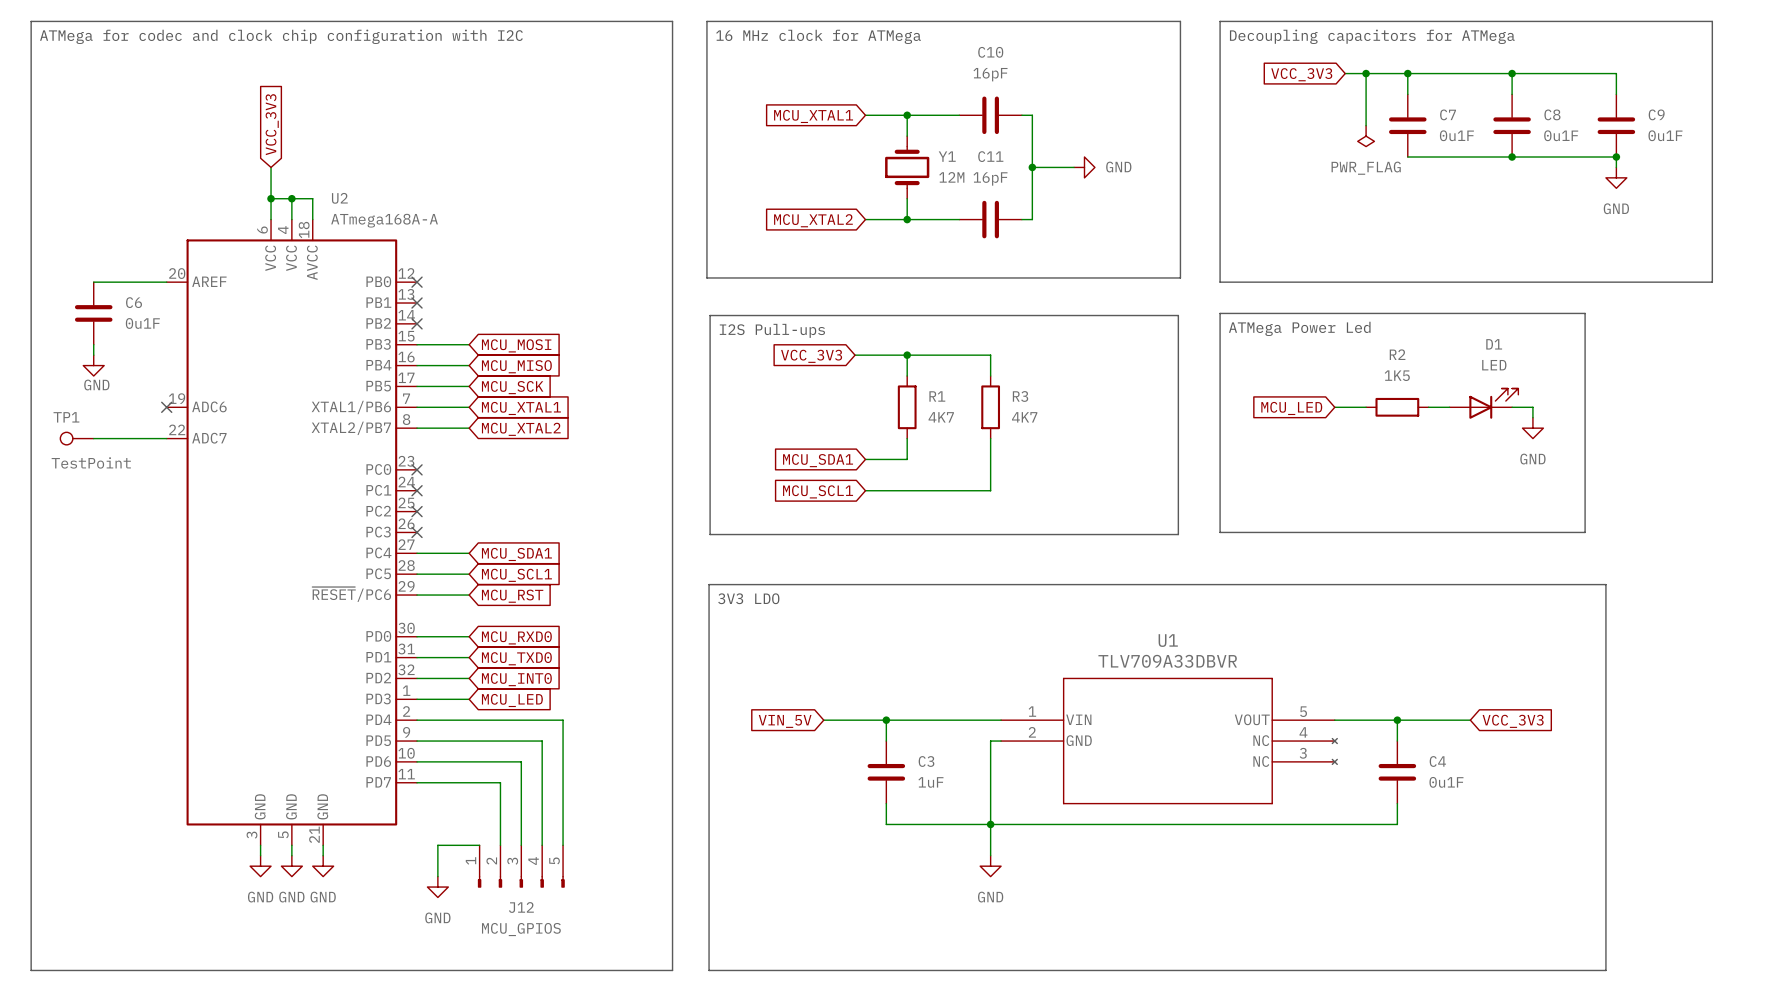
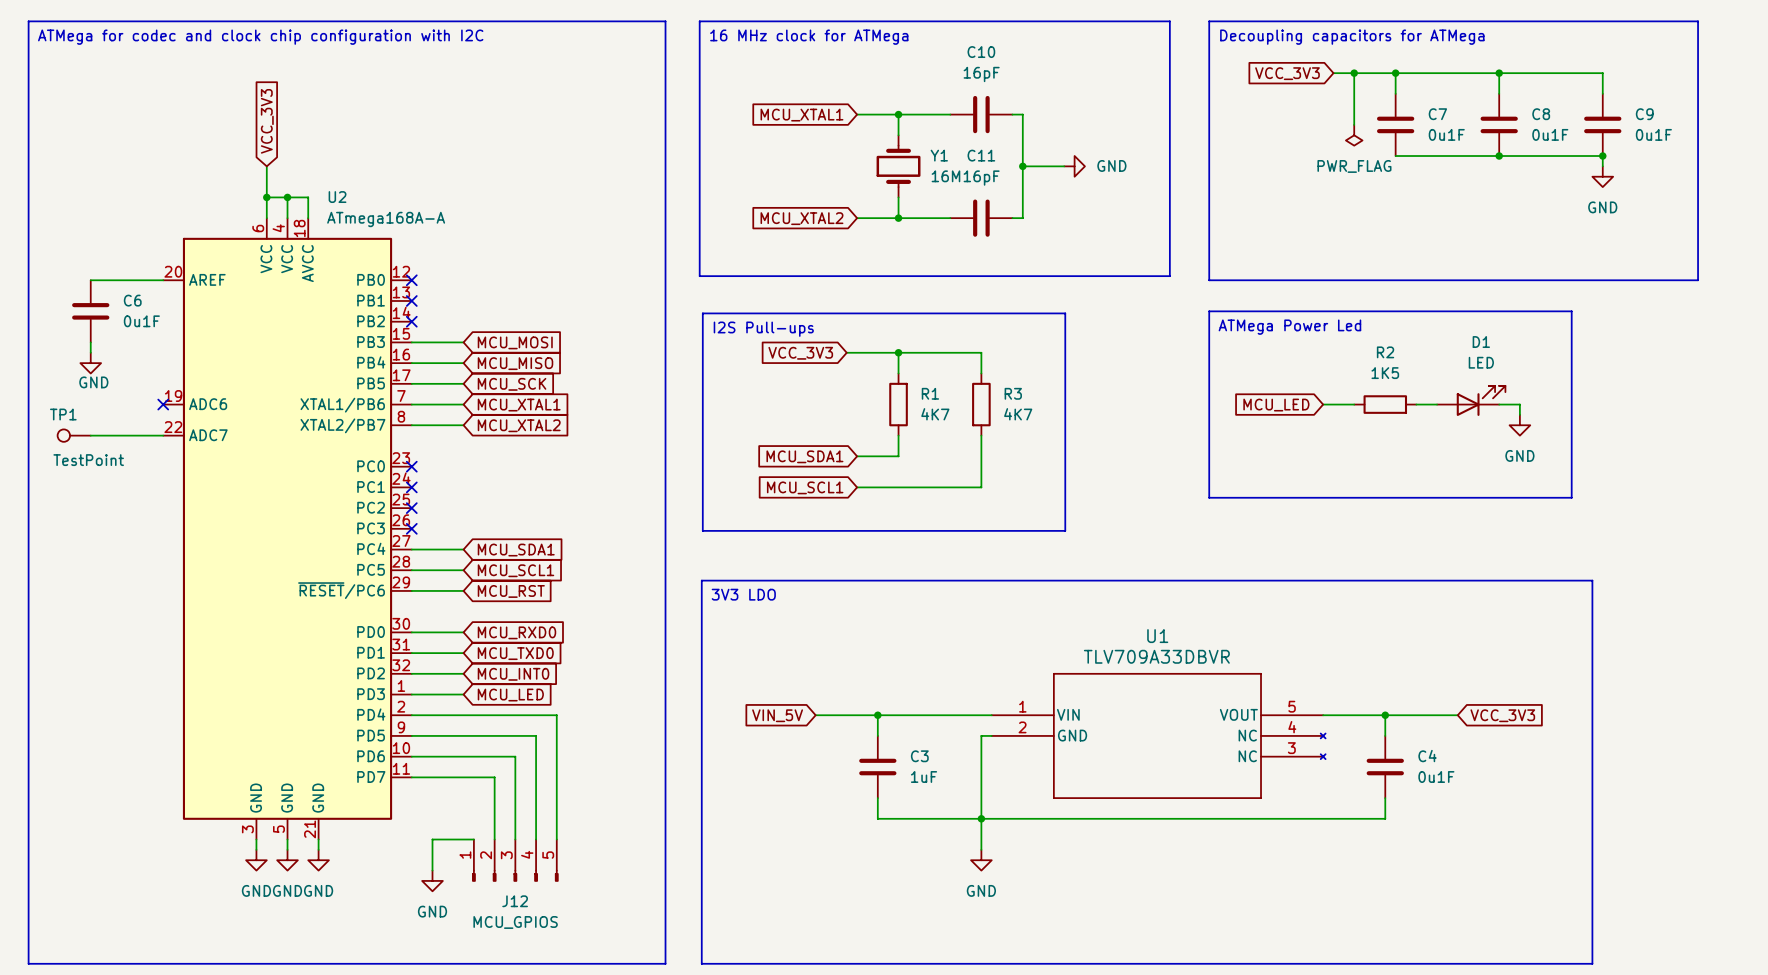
Y1 value: 12M (951, 177) -> 16M (945, 176)
line: (1075, 315) (1178, 315) (1178, 534) (1075, 534) -> (1065, 313) (1065, 530)
line: (1220, 501) (1220, 532) (1585, 532) (1585, 501) -> (1209, 497) (1571, 497)

